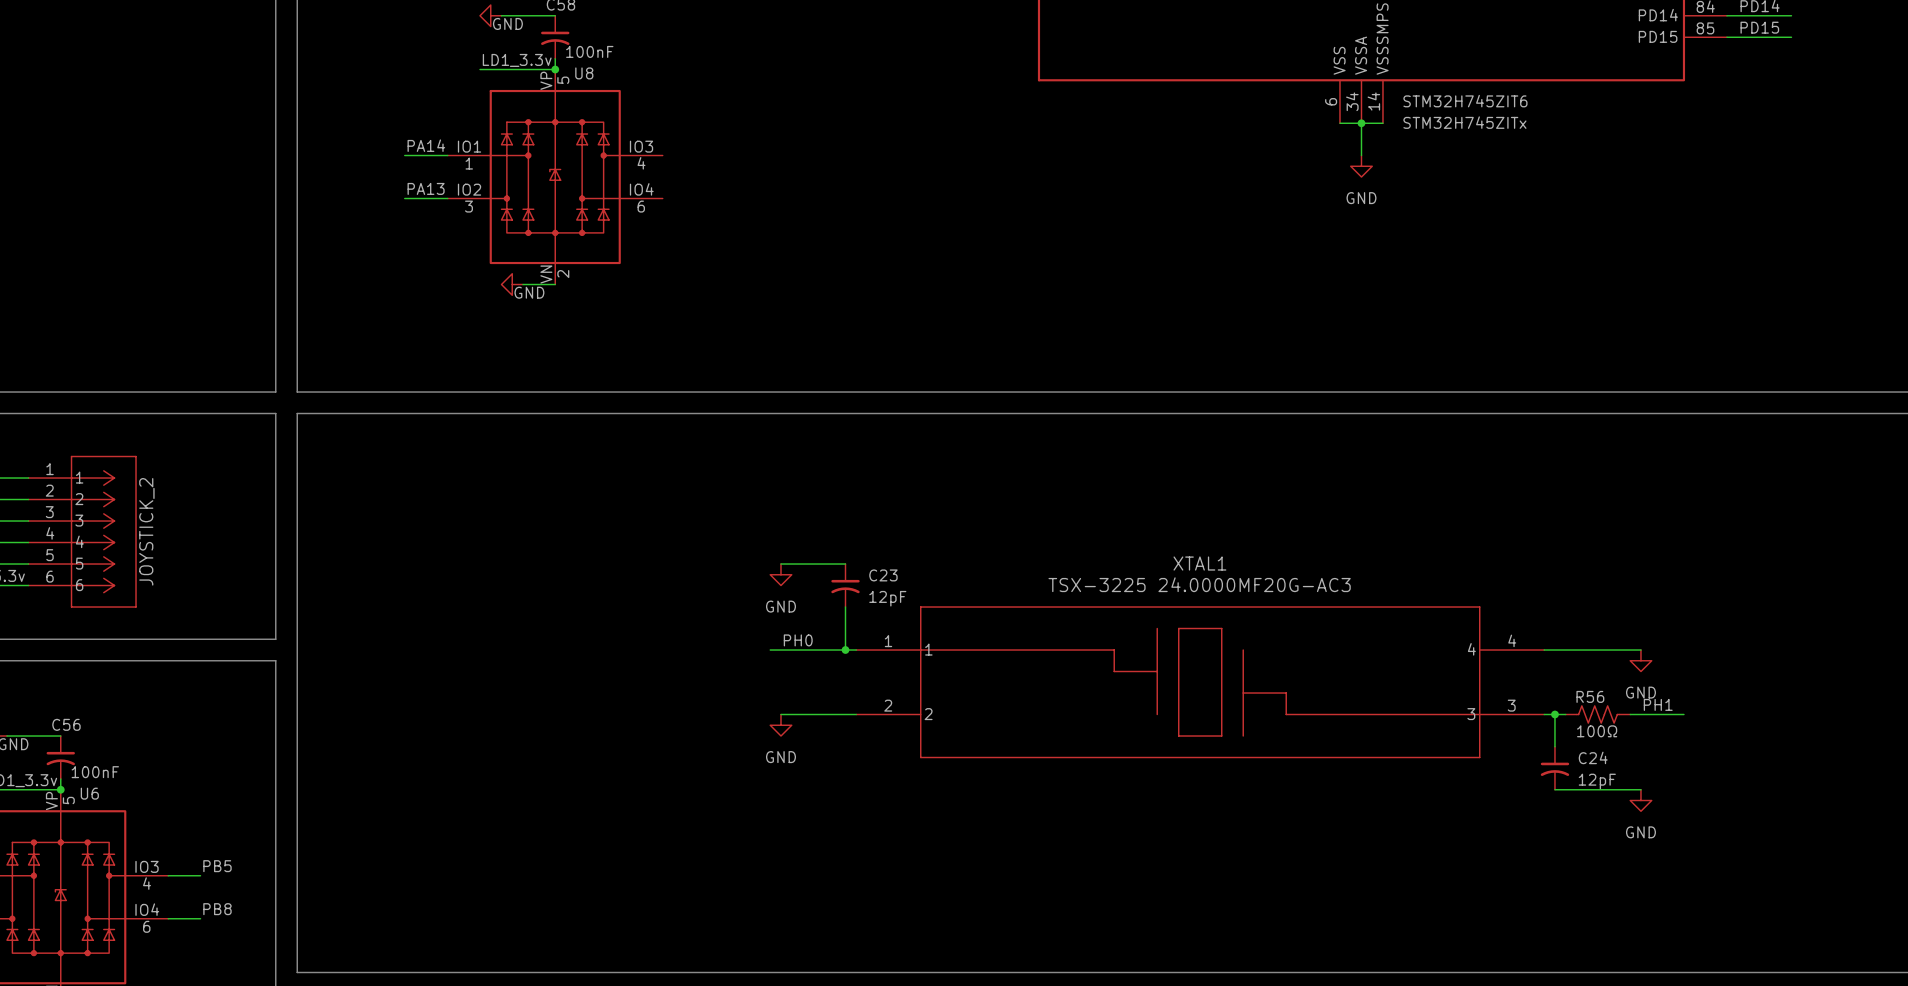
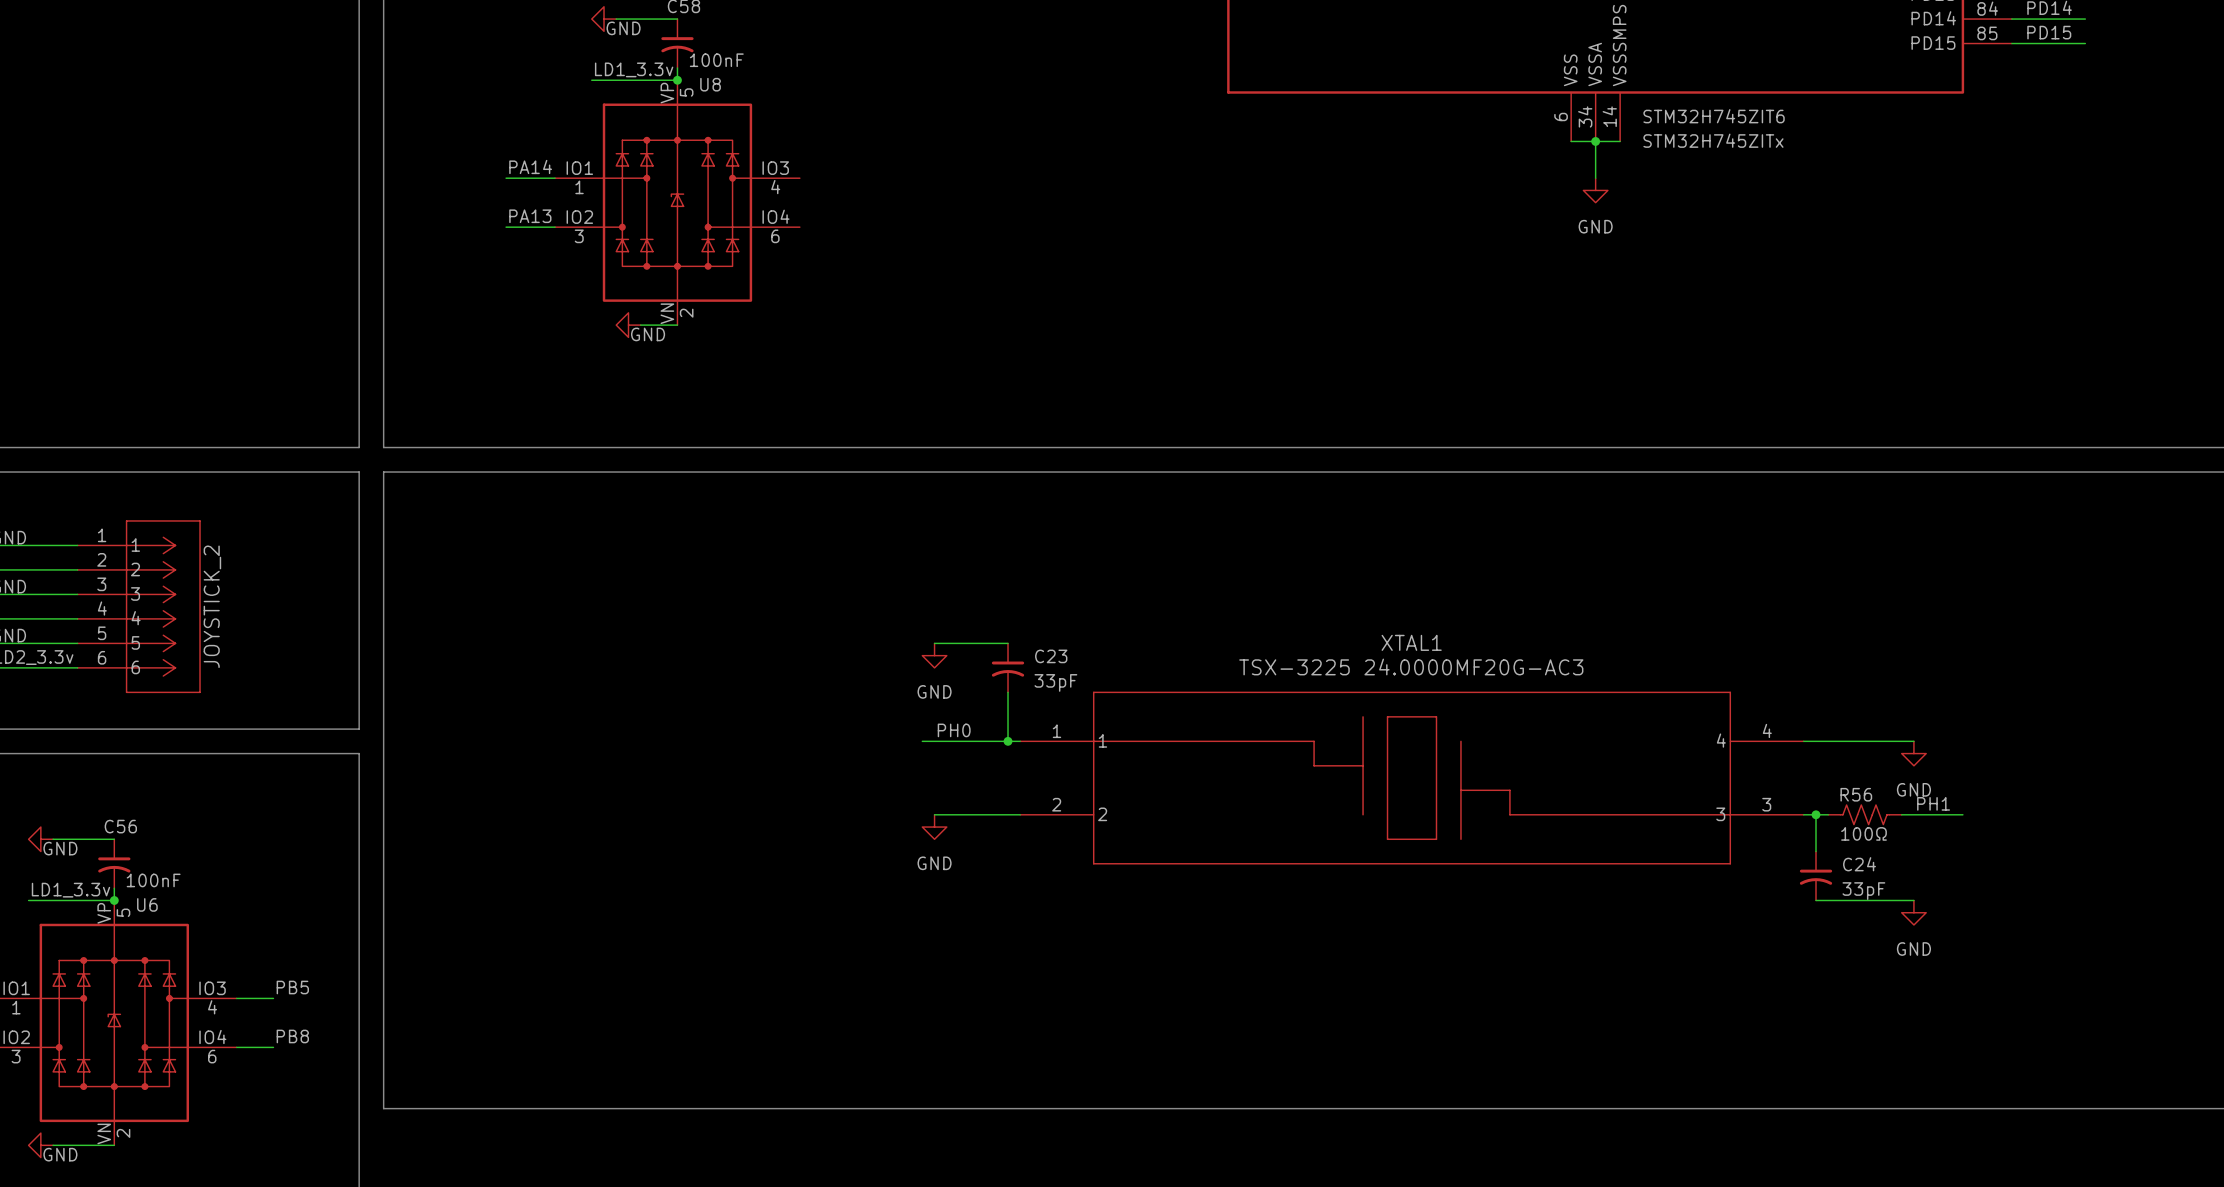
C23 value: 12pF (887, 598) -> 33pF (1055, 682)
C24 value: 12pF (1597, 781) -> 33pF (1863, 891)

